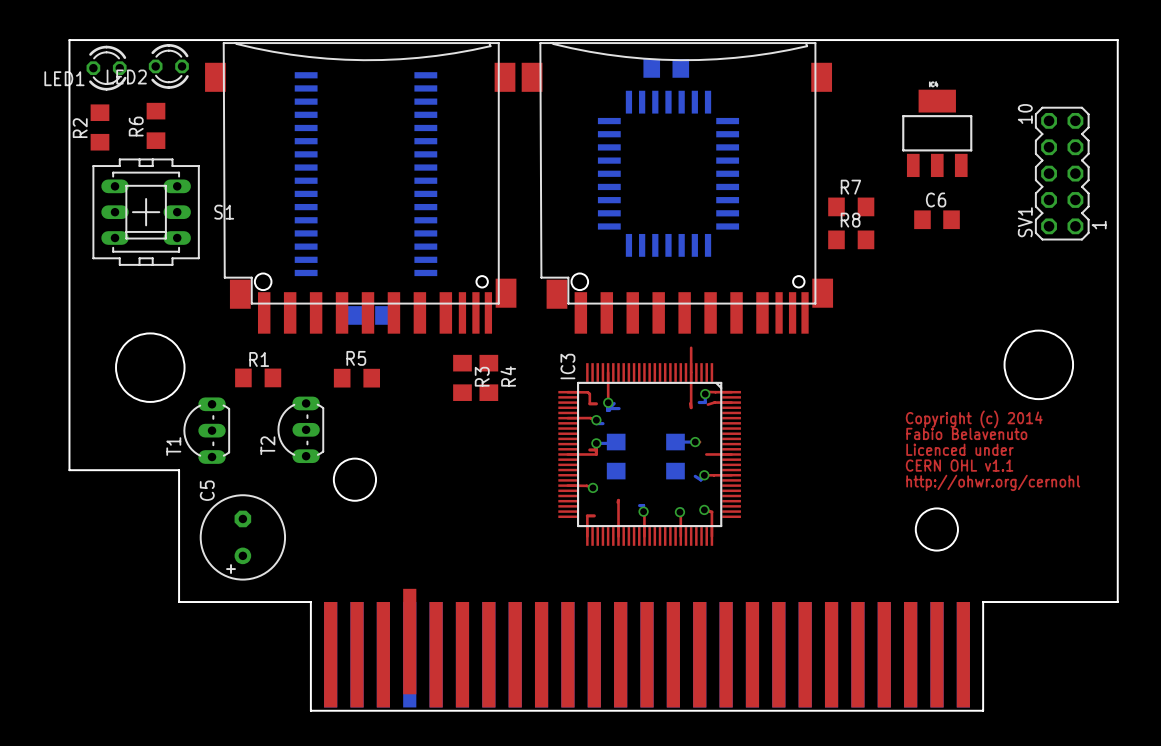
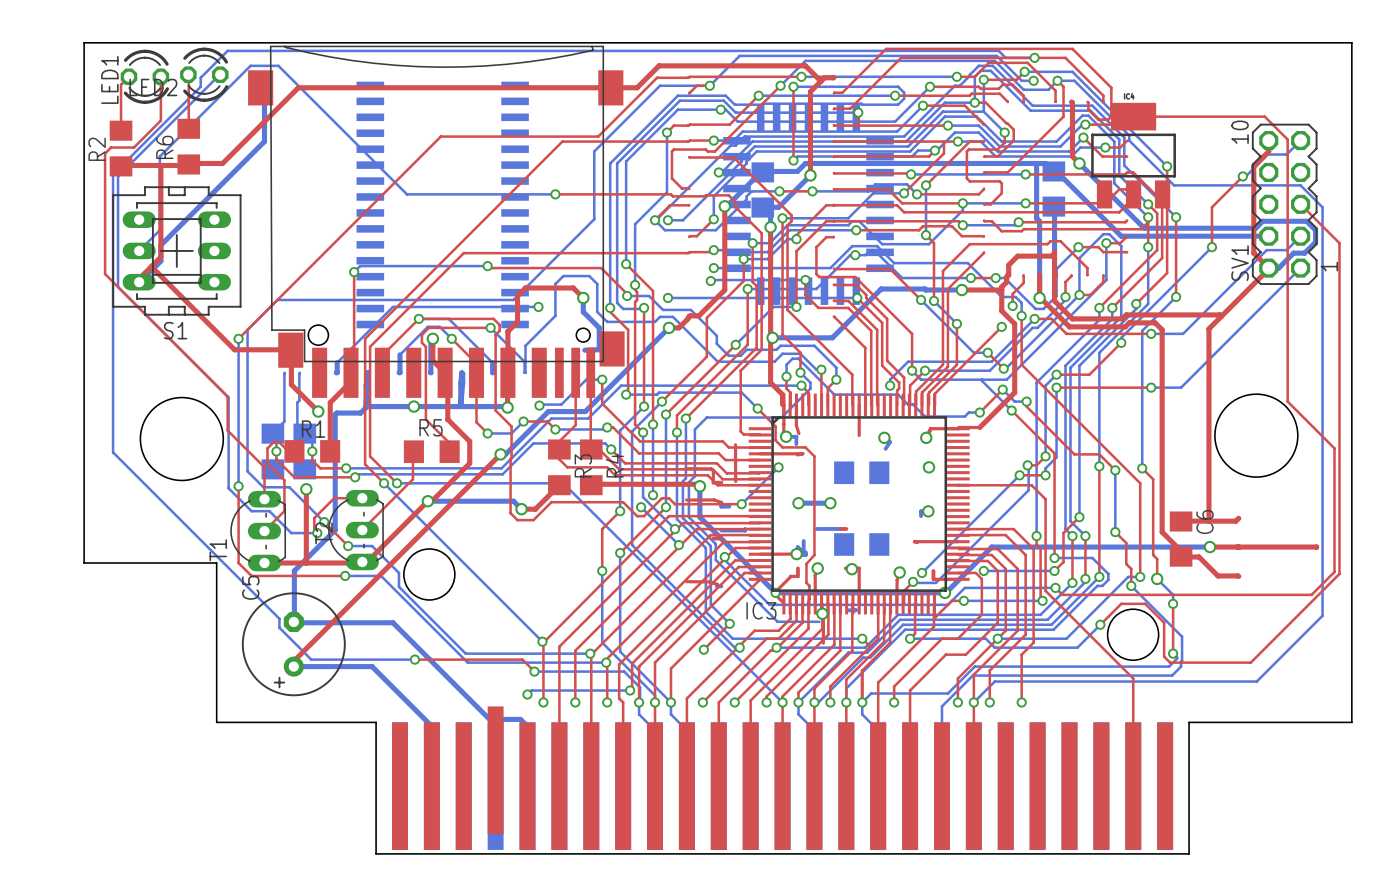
bottom track: none -> (1034, 57) (1005, 57) (998, 50) (227, 50) (200, 77) (200, 86) (113, 174) (113, 452) (279, 618) (279, 627) (311, 659) (414, 659)
via: none -> (1034, 57)
top track: none -> (1024, 71) (1016, 79) (983, 79)
bottom track: none -> (1024, 71) (1072, 71) (1167, 166)
via: none -> (1024, 71)
top track: none -> (188, 74) (188, 128)
bottom track: none -> (220, 74) (118, 176) (118, 287) (228, 397) (228, 488) (251, 511) (269, 511) (291, 533) (317, 533)
top track: none -> (129, 76) (121, 84) (121, 130)
LED1 position: (106, 68) -> (144, 76)
top track: none -> (160, 76) (160, 120) (133, 147) (111, 147) (105, 153) (105, 274) (227, 396) (227, 430) (264, 467) (264, 499)
top track: none -> (801, 76) (657, 77) (598, 136) (440, 136) (238, 338)
bottom track: none -> (801, 76) (956, 76)
via: none -> (801, 76)
part rotation: 0° (666, 68) -> 90° clockwise (762, 189)
part position: (666, 68) -> (762, 189)
top track: none -> (833, 77) (824, 77) (810, 91) (810, 175)
top track: none -> (956, 76) (974, 76) (988, 62) (1027, 62) (1055, 90) (1055, 101)
via: none -> (956, 76)
bottom track: none -> (983, 79) (983, 111)
via: none -> (983, 79)
top track: none -> (820, 81) (805, 65) (659, 65) (637, 87) (298, 87) (222, 163) (121, 166)
bottom track: none -> (1033, 80) (1021, 80) (996, 55) (739, 55) (709, 85) (660, 85) (594, 151) (594, 219) (513, 299) (277, 299) (247, 329) (247, 471) (263, 487) (289, 487) (324, 522)
via: none -> (1033, 80)
top track: none -> (1057, 80) (1063, 86) (1063, 116) (1007, 172) (984, 172)
via: none -> (1057, 80)
top track: none -> (709, 85) (696, 85) (689, 93)
via: none -> (709, 85)
top track: none -> (780, 85) (714, 151) (707, 151) (705, 149) (673, 149) (671, 151) (671, 178) (681, 188) (689, 189)
bottom track: none -> (780, 85) (805, 60) (994, 60) (1023, 89) (1048, 89) (1057, 80) (1074, 80) (1129, 135) (1129, 140) (1174, 185) (1300, 185) (1322, 207) (1322, 615) (1256, 681) (994, 681) (973, 702)
via: none -> (780, 85)
top track: none -> (793, 86) (793, 160)
bottom track: none -> (793, 86) (898, 86) (904, 92) (904, 98) (898, 104) (734, 104) (725, 95) (677, 95) (610, 163) (610, 307)
via: none -> (793, 86)
top track: none -> (930, 86) (998, 88) (1002, 84) (1012, 84) (1023, 95) (1023, 101)
bottom track: none -> (930, 86) (895, 121) (737, 121) (725, 109) (677, 109) (626, 161) (626, 264)
via: none -> (930, 86)
bottom track: none -> (264, 87) (264, 141) (160, 245) (160, 261) (139, 282)
LED1 name rotation: 0° (64, 78) -> 90° counterclockwise (109, 79)
top track: none -> (833, 93) (842, 92) (886, 48) (1072, 48) (1111, 87) (1111, 116)
top track: none -> (758, 95) (729, 124) (673, 125) (666, 132)
bottom track: none -> (758, 95) (895, 95)
via: none -> (758, 95)
top track: none -> (895, 95) (999, 93) (1007, 101)
via: none -> (895, 95)
top track: none -> (1071, 101) (1072, 156) (1079, 163)
top track: none -> (1087, 101) (1088, 109) (1098, 119) (1108, 119) (1111, 116)
top track: none -> (1103, 101) (1103, 95) (1065, 57) (901, 57) (850, 108) (833, 109)
top track: none -> (974, 102) (985, 102) (1013, 129) (1013, 140) (997, 156) (984, 156)
via: none -> (974, 102)
top track: none -> (923, 105) (964, 105) (984, 124)
bottom track: none -> (923, 105) (897, 131) (742, 131) (733, 140) (713, 140)
via: none -> (923, 105)
via: none -> (720, 109)
bottom track: none -> (983, 111) (942, 111) (908, 146) (754, 146) (682, 220) (667, 220)
bottom track: none -> (983, 111) (1004, 132)
top track: none -> (858, 112) (858, 125)
bottom track: none -> (858, 112) (735, 112) (723, 100) (679, 100) (617, 163) (617, 302) (623, 308) (644, 307)
via: none -> (858, 112)
top track: none -> (1111, 116) (1264, 116) (1287, 139) (1287, 401) (1334, 448) (1334, 571) (1311, 594) (1062, 594) (1055, 587)
top track: none -> (1085, 124) (1127, 124)
bottom track: none -> (1085, 124) (1082, 124) (1060, 146) (999, 146) (978, 125) (947, 125)
via: none -> (1085, 124)
top track: none -> (833, 125) (947, 125)
via: none -> (947, 125)
bottom track: none -> (666, 132) (666, 192) (635, 224) (635, 285)
via: none -> (666, 132)
top track: none -> (1004, 132) (1004, 142) (997, 149) (968, 149) (966, 151) (966, 178) (969, 181) (999, 181) (1001, 183) (1001, 193) (990, 204) (984, 204)
via: none -> (1004, 132)
top track: none -> (1083, 137) (1102, 156) (1127, 156)
bottom track: none -> (1083, 137) (1069, 151) (997, 151) (978, 132) (954, 132) (936, 150) (918, 150) (912, 156) (797, 156) (793, 160)
via: none -> (1083, 137)
top track: none -> (713, 140) (562, 141) (365, 338) (365, 464) (384, 483)
via: none -> (713, 140)
top track: none -> (1268, 140) (1268, 151) (1253, 166) (1253, 253) (1268, 268) (1208, 328) (1208, 521)
bottom track: none -> (1300, 140) (1286, 154) (1267, 154) (1245, 176) (1242, 176)
top track: none -> (833, 141) (957, 141)
top track: none -> (943, 141) (943, 153) (904, 193)
bottom track: none -> (957, 141) (980, 141) (995, 156) (1071, 156) (1080, 147) (1105, 147)
via: none -> (957, 141)
top track: none -> (984, 140) (969, 141) (926, 185)
top track: none -> (1127, 140) (1120, 147) (1105, 147)
via: none -> (1105, 147)
top track: none -> (934, 150) (929, 156) (833, 157)
via: none -> (934, 150)
top track: none -> (689, 157) (733, 157) (791, 215) (791, 221) (787, 225) (787, 309) (852, 374) (852, 404)
via: none -> (793, 160)
bottom track: none -> (1036, 163) (1036, 218) (1039, 221) (1039, 297)
bottom track: none -> (1079, 163) (1144, 228) (1255, 228) (1262, 221) (1306, 221) (1315, 230) (1315, 242) (1304, 253) (1293, 253) (1278, 268) (1268, 268)
via: none -> (1079, 163)
top track: none -> (160, 165) (160, 257) (139, 278) (139, 282)
top track: none -> (1167, 166) (1167, 273) (1136, 303)
via: none -> (1167, 166)
bottom track: none -> (718, 172) (721, 172) (752, 141) (906, 141) (944, 102) (974, 102) (974, 76) (980, 70) (990, 70) (1030, 110) (1090, 110) (1119, 139) (1119, 175) (1148, 204)
via: none -> (718, 172)
top track: none -> (833, 173) (911, 174)
bottom track: none -> (911, 174) (1025, 174)
via: none -> (911, 174)
top track: none -> (1025, 174) (1125, 174) (1133, 172) (1162, 201) (1162, 258) (1112, 307)
via: none -> (1025, 174)
bottom track: none -> (810, 175) (778, 207) (762, 207) (770, 209) (770, 227)
via: none -> (810, 175)
top track: none -> (1242, 176) (1211, 207) (1211, 247)
via: none -> (1242, 176)
bottom track: none -> (926, 185) (926, 235)
via: none -> (926, 185)
top track: none -> (833, 189) (888, 189) (902, 203) (962, 203)
top track: none -> (984, 188) (978, 194) (917, 194)
part: none -> (1053, 189)
top track: none -> (1127, 188) (1119, 189) (1105, 203) (1025, 203)
top track: none -> (779, 191) (812, 191)
bottom track: none -> (779, 191) (751, 191) (746, 196) (746, 199) (715, 230) (665, 230) (655, 220) (730, 145) (735, 145) (744, 136) (904, 136) (954, 85) (959, 85) (978, 65) (992, 65) (1032, 105) (1092, 105) (1124, 137) (1124, 165) (1176, 217)
via: none -> (779, 191)
bottom track: none -> (812, 191) (868, 191) (875, 184) (907, 184) (917, 194)
via: none -> (812, 191)
bottom track: none -> (904, 193) (873, 193) (848, 218) (782, 218)
via: none -> (904, 193)
top track: none -> (555, 194) (728, 195) (735, 202) (735, 207) (761, 233) (761, 349) (740, 370) (740, 431) (743, 434) (759, 434)
bottom track: none -> (555, 194) (406, 194) (278, 65) (250, 65) (159, 156) (159, 230) (139, 250)
via: none -> (555, 194)
via: none -> (917, 194)
via: none -> (962, 203)
bottom track: none -> (1025, 203) (962, 203) (962, 210) (929, 244) (882, 244) (859, 221) (852, 221) (848, 225) (787, 225) (769, 243) (752, 243)
via: none -> (1025, 203)
top track: none -> (1127, 204) (1119, 212) (904, 212) (897, 205) (826, 205) (796, 235) (796, 239)
top track: none -> (1148, 204) (1157, 213) (1157, 250) (1099, 307)
via: none -> (1148, 204)
top track: none -> (1300, 204) (1339, 243) (1339, 573) (1250, 662) (1170, 662) (1164, 656) (1164, 622) (1145, 603) (1121, 603) (1100, 624)
top track: none -> (689, 204) (669, 205) (655, 220)
top track: none -> (724, 206) (724, 290) (698, 315) (689, 315) (678, 327) (668, 327)
bottom track: none -> (724, 206) (760, 172) (797, 171) (805, 163) (1045, 163) (1053, 171) (1055, 170) (1121, 236) (1268, 236)
via: none -> (724, 206)
bottom track: none -> (1053, 206) (1054, 252)
top track: none -> (1148, 217) (1148, 247)
bottom track: none -> (1148, 217) (1114, 183) (1114, 141) (1088, 115) (1082, 115) (1056, 141) (1001, 141) (976, 116) (944, 116) (910, 151) (756, 151) (713, 196) (713, 219)
via: none -> (1148, 217)
top track: none -> (1176, 217) (1176, 296)
via: none -> (1176, 217)
top track: none -> (713, 219) (696, 236) (689, 236)
via: none -> (713, 219)
top track: none -> (782, 218) (782, 334) (800, 352) (800, 372)
via: none -> (782, 218)
via: none -> (655, 220)
via: none -> (667, 220)
top track: none -> (984, 220) (991, 221) (1001, 231) (1021, 231) (1023, 229) (1141, 229) (1148, 222)
top track: none -> (1127, 220) (1125, 222) (1018, 222)
part: (677, 188) -> none
bottom track: none -> (1018, 222) (1015, 225) (962, 225)
via: none -> (1018, 222)
top track: none -> (962, 225) (958, 221) (826, 221) (796, 251) (796, 306)
via: none -> (962, 225)
top track: none -> (770, 227) (770, 382) (782, 394) (783, 433) (786, 436)
via: none -> (770, 227)
top track: none -> (856, 230) (919, 230) (923, 226) (951, 226) (961, 236) (984, 236)
bottom track: none -> (856, 230) (789, 230) (767, 252) (713, 250)
via: none -> (856, 230)
top track: none -> (926, 235) (933, 243) (933, 300)
via: none -> (926, 235)
bottom track: none -> (1300, 236) (1286, 250) (1266, 250) (1183, 333) (1151, 333)
top track: none -> (833, 236) (826, 237) (816, 247) (816, 274) (819, 277) (855, 277) (912, 333) (912, 370)
top track: none -> (1127, 236) (1120, 243) (1106, 243)
bottom track: none -> (796, 239) (787, 239) (767, 259) (743, 259)
via: none -> (796, 239)
top track: none -> (752, 243) (752, 282) (756, 286) (756, 347) (685, 418)
via: none -> (752, 243)
bottom track: none -> (1106, 243) (1106, 280) (1006, 379) (921, 379) (912, 370)
via: none -> (1106, 243)
R7: (851, 206) -> none
top track: none -> (1078, 247) (1098, 247) (1103, 252) (1127, 252)
bottom track: none -> (1078, 247) (1056, 269) (1056, 295) (1043, 308) (1035, 308) (1004, 278) (995, 278)
via: none -> (1078, 247)
bottom track: none -> (1148, 247) (1148, 303) (1099, 352) (1099, 466)
via: none -> (1148, 247)
bottom track: none -> (1211, 247) (1121, 337) (1121, 342)
via: none -> (1211, 247)
top track: none -> (713, 250) (711, 252) (687, 253) (463, 253) (370, 346) (370, 456) (397, 483)
via: none -> (713, 250)
S1 name position: S1 (224, 212) -> S1 (175, 330)
top track: none -> (984, 252) (947, 289) (947, 366) (922, 392) (921, 404)
via: none -> (855, 255)
top track: none -> (743, 259) (743, 281) (706, 317) (706, 356) (662, 401)
via: none -> (743, 259)
C6 rotation: 0° (937, 219) -> 90° clockwise (1181, 539)
C6 position: (937, 219) -> (1181, 539)
top track: none -> (626, 264) (653, 291) (653, 424)
via: none -> (626, 264)
top track: none -> (487, 266) (489, 268) (601, 268) (627, 295)
bottom track: none -> (487, 266) (360, 266) (354, 272)
via: none -> (487, 266)
top track: none -> (151, 266) (234, 349) (290, 349) (291, 384) (318, 411)
bottom track: none -> (713, 268) (830, 268) (852, 246) (877, 246) (894, 263) (967, 263) (1001, 296) (1015, 296) (1021, 302) (1021, 315)
via: none -> (713, 268)
top track: none -> (833, 268) (890, 269) (921, 299)
bottom track: none -> (1300, 268) (1181, 387) (1151, 387)
top track: none -> (354, 272) (354, 375) (350, 379)
via: none -> (354, 272)
top track: none -> (1023, 275) (1023, 283) (1012, 293) (1012, 305)
top track: none -> (1039, 275) (1039, 297) (1069, 326) (1125, 326) (1129, 322) (1155, 322) (1162, 329) (1162, 532) (1180, 550) (1181, 557) (1199, 557) (1217, 575) (1238, 576)
top track: none -> (1055, 275) (1054, 252) (1052, 256) (1017, 256) (1008, 265) (1006, 282) (1001, 287) (1001, 310) (1014, 323) (1014, 392) (979, 427) (930, 428) (926, 437)
top track: none -> (1055, 275) (1054, 300) (1072, 318) (1122, 318) (1126, 314) (1221, 316)
top track: none -> (1071, 275) (1065, 282) (1065, 296)
top track: none -> (1087, 275) (1087, 268) (1060, 241) (1050, 241) (1047, 244) (969, 244) (942, 271) (942, 364) (916, 391) (915, 404)
top track: none -> (1103, 275) (1103, 282) (1090, 294) (1079, 294)
top track: none -> (970, 278) (995, 278)
bottom track: none -> (970, 278) (902, 278) (875, 251) (869, 251) (865, 255) (850, 255) (816, 289) (747, 289)
via: none -> (970, 278)
via: none -> (995, 278)
top track: none -> (805, 280) (805, 294) (818, 307) (848, 307) (871, 330) (871, 404)
bottom track: none -> (805, 280) (710, 281)
via: none -> (805, 280)
via: none -> (710, 281)
R8: (851, 239) -> none
top track: none -> (635, 285) (637, 292) (637, 299) (635, 301) (635, 424) (643, 432)
via: none -> (635, 285)
top track: none -> (833, 284) (856, 285) (887, 318) (887, 360) (904, 377) (903, 404)
top track: none -> (747, 289) (747, 344) (676, 415) (676, 432)
via: none -> (747, 289)
top track: none -> (961, 290) (1001, 290)
bottom track: none -> (961, 290) (881, 289) (832, 337) (772, 337)
via: none -> (961, 290)
via: none -> (1079, 294)
bottom track: none -> (627, 295) (649, 295) (663, 309) (690, 309) (716, 335) (716, 343) (728, 355) (740, 355) (746, 349) (776, 349) (780, 345) (814, 345) (836, 367) (836, 379)
via: none -> (627, 295)
bottom track: none -> (1065, 296) (1065, 299) (1037, 327) (1032, 327) (989, 370) (925, 370)
via: none -> (1065, 296)
bottom track: none -> (1176, 296) (1142, 330) (1142, 468)
via: none -> (1176, 296)
top track: none -> (583, 297) (573, 288) (525, 288) (517, 295) (517, 321) (507, 331) (507, 407)
bottom track: none -> (583, 297) (583, 311) (599, 327) (599, 349) (584, 350)
via: none -> (583, 297)
bottom track: none -> (667, 297) (857, 297)
via: none -> (667, 297)
top track: none -> (857, 297) (882, 322) (882, 365) (899, 382) (896, 404)
via: none -> (857, 297)
via: none -> (1039, 297)
bottom track: none -> (921, 299) (973, 352) (987, 352)
via: none -> (921, 299)
top track: none -> (833, 300) (848, 300) (877, 329) (878, 404)
bottom track: none -> (933, 300) (956, 323)
via: none -> (933, 300)
bottom track: none -> (1136, 303) (1136, 308) (1079, 365) (1079, 517)
via: none -> (1136, 303)
via: none -> (1012, 305)
bottom track: none -> (538, 306) (393, 306) (337, 362) (336, 372)
via: none -> (538, 306)
bottom track: none -> (796, 306) (773, 306) (735, 344)
via: none -> (796, 306)
top track: none -> (610, 307) (610, 311) (628, 329) (628, 392) (626, 394)
via: none -> (610, 307)
top track: none -> (644, 307) (644, 406)
via: none -> (644, 307)
bottom track: none -> (1099, 307) (1099, 319) (1036, 382) (1036, 536)
via: none -> (1099, 307)
bottom track: none -> (1112, 307) (1112, 318) (1065, 365) (1065, 529) (1072, 536)
via: none -> (1112, 307)
top track: none -> (1021, 315) (1021, 364) (1140, 483) (1140, 576)
via: none -> (1021, 315)
top track: none -> (833, 316) (865, 347) (865, 404)
bottom track: none -> (418, 318) (448, 318) (492, 362) (493, 372)
via: none -> (418, 318)
top track: none -> (1034, 318) (1051, 318) (1066, 333) (1151, 333)
bottom track: none -> (1034, 318) (991, 361) (908, 361) (890, 379) (890, 385)
via: none -> (1034, 318)
top track: none -> (956, 323) (956, 364) (929, 392) (928, 404)
via: none -> (956, 323)
top track: none -> (1001, 326) (934, 393) (934, 404)
via: none -> (1001, 326)
top track: none -> (490, 327) (428, 327) (421, 334) (421, 342) (425, 346) (425, 419) (448, 442) (448, 451) (441, 451)
bottom track: none -> (490, 327) (524, 361) (525, 372) (525, 345) (555, 315) (555, 284) (563, 276) (589, 276) (597, 284) (597, 311) (607, 321) (655, 321) (660, 316) (672, 316) (717, 361) (774, 361) (782, 353) (800, 353) (816, 369) (821, 369)
via: none -> (490, 327)
bottom track: none -> (668, 327) (585, 411) (548, 411) (505, 454) (500, 454)
via: none -> (668, 327)
via: none -> (1151, 333)
bottom track: none -> (238, 338) (238, 486)
via: none -> (238, 338)
top track: none -> (432, 338) (432, 360) (445, 372)
bottom track: none -> (432, 338) (430, 340) (430, 372)
via: none -> (432, 338)
top track: none -> (451, 338) (475, 362) (476, 422) (487, 433)
bottom track: none -> (451, 338) (439, 326) (427, 326) (399, 354) (399, 372)
via: none -> (451, 338)
via: none -> (772, 337)
top track: none -> (1121, 342) (1089, 374) (1056, 374)
via: none -> (1121, 342)
top track: none -> (735, 344) (665, 414)
via: none -> (735, 344)
top track: none -> (987, 352) (1003, 368)
via: none -> (987, 352)
bottom track: none -> (1003, 368) (1079, 294) (1079, 258) (1103, 234) (1109, 234) (1121, 246) (1121, 316) (1070, 367) (1070, 521) (1085, 536)
via: none -> (1003, 368)
top track: none -> (821, 369) (821, 404)
via: none -> (821, 369)
via: none -> (912, 370)
top track: none -> (925, 370) (910, 385) (909, 404)
via: none -> (925, 370)
bottom track: none -> (284, 372) (284, 421) (272, 433) (276, 437) (276, 451)
bottom track: none -> (299, 372) (297, 425) (312, 441) (312, 451)
top track: none -> (351, 372) (350, 382) (330, 402) (330, 451)
top track: none -> (382, 372) (383, 354) (418, 318) (493, 318) (499, 324) (499, 330) (495, 334) (495, 410) (511, 426) (510, 513) (517, 520) (533, 520) (551, 502) (623, 502) (637, 516) (644, 516) (662, 498) (668, 498) (674, 504) (741, 504)
top track: none -> (445, 372) (447, 375) (447, 419) (469, 441) (469, 463) (431, 501) (427, 501) (370, 561) (362, 561)
bottom track: none -> (461, 372) (462, 382) (460, 406) (460, 383) (461, 372)
top track: none -> (575, 372) (575, 425) (559, 441) (559, 459) (567, 467) (607, 467) (615, 475) (707, 475) (717, 485) (759, 485)
top track: none -> (590, 372) (590, 448) (597, 447) (619, 469) (712, 469) (722, 479) (760, 478)
bottom track: none -> (800, 372) (810, 382) (810, 388) (781, 417) (706, 417) (694, 429) (694, 476) (688, 482) (688, 517) (715, 544) (715, 560) (777, 621) (819, 621)
via: none -> (800, 372)
bottom track: none -> (1056, 374) (1045, 385) (1045, 456)
via: none -> (1056, 374)
part: (368, 315) -> none
top track: none -> (786, 376) (786, 388) (790, 392) (790, 404)
bottom track: none -> (786, 376) (786, 364) (792, 358) (798, 358) (834, 394) (898, 394) (908, 404) (913, 404) (925, 416) (964, 416) (968, 412) (979, 412)
via: none -> (786, 376)
top track: none -> (602, 379) (602, 403) (640, 441) (722, 441) (728, 447) (760, 447)
bottom track: none -> (602, 379) (586, 379) (561, 404) (539, 405)
via: none -> (602, 379)
top track: none -> (836, 379) (827, 388) (827, 404)
via: none -> (836, 379)
bottom track: none -> (981, 379) (1011, 410)
top track: none -> (801, 385) (808, 392) (808, 404)
bottom track: none -> (801, 385) (621, 385) (588, 418) (551, 418) (501, 468) (346, 468)
via: none -> (801, 385)
via: none -> (890, 385)
top track: none -> (1056, 387) (1151, 387)
bottom track: none -> (1056, 387) (1056, 457) (1045, 468) (1045, 475)
via: none -> (1056, 387)
via: none -> (1151, 387)
top track: none -> (1002, 389) (979, 412)
bottom track: none -> (1002, 389) (1014, 401) (1026, 401)
via: none -> (1002, 389)
bottom track: none -> (626, 394) (741, 392) (757, 408)
via: none -> (626, 394)
bottom track: none -> (662, 401) (632, 431) (632, 545) (734, 647) (739, 647)
via: none -> (662, 401)
top track: none -> (1026, 401) (1026, 406) (1074, 454) (1099, 454) (1115, 470)
via: none -> (1026, 401)
top track: none -> (796, 404) (796, 425) (798, 433)
top track: none -> (859, 404) (859, 435)
via: none -> (413, 406)
via: none -> (539, 405)
bottom track: none -> (644, 406) (620, 430) (620, 511)
via: none -> (644, 406)
bottom track: none -> (507, 407) (506, 406) (366, 406) (366, 385) (367, 372) (367, 373) (367, 382) (366, 407) (360, 413) (335, 414) (335, 530) (294, 570) (293, 621) (393, 622) (494, 724) (495, 786) (495, 726) (502, 719) (520, 719) (527, 726) (527, 786)
via: none -> (507, 407)
top track: none -> (757, 408) (775, 426) (775, 440) (782, 447) (805, 447) (814, 456) (814, 555) (806, 563) (806, 582) (809, 585) (808, 628) (734, 702)
via: none -> (757, 408)
via: none -> (318, 411)
top track: none -> (1011, 410) (1054, 453) (1054, 558)
via: none -> (1011, 410)
via: none -> (979, 412)
bottom track: none -> (665, 414) (665, 507)
via: none -> (665, 414)
top track: (691, 347) (691, 407) (690, 403) -> none
bottom track: none -> (685, 418) (685, 478) (682, 481) (682, 518) (710, 546) (710, 604) (729, 623)
via: none -> (685, 418)
top track: none -> (523, 421) (547, 421) (555, 429)
bottom track: none -> (523, 421) (511, 433) (487, 433)
via: none -> (523, 421)
bottom track: none -> (653, 424) (653, 495)
via: none -> (653, 424)
top track: none -> (607, 427) (613, 427) (639, 453) (718, 453) (725, 460) (760, 460)
bottom track: none -> (607, 427) (605, 429) (555, 429)
via: none -> (607, 427)
via: none -> (555, 429)
bottom track: none -> (643, 432) (643, 497) (674, 529)
via: none -> (643, 432)
bottom track: none -> (676, 432) (676, 519) (705, 548) (705, 611) (732, 638) (862, 638)
via: none -> (676, 432)
via: none -> (487, 433)
bottom track: none -> (786, 436) (796, 436) (796, 444)
via: none -> (786, 436)
bottom track: none -> (884, 437) (890, 442) (885, 448)
via: none -> (884, 437)
via: none -> (926, 437)
top track: none -> (611, 449) (625, 463) (716, 463) (726, 473) (760, 472)
bottom track: none -> (611, 449) (605, 443) (533, 443) (502, 474) (358, 474) (355, 477)
via: none -> (611, 449)
top track: none -> (276, 451) (276, 459) (294, 477) (355, 477)
via: none -> (276, 451)
top track: none -> (294, 451) (288, 451) (279, 442) (273, 442) (267, 448) (267, 463) (284, 480) (284, 511) (264, 531)
top track: none -> (312, 451) (312, 460) (320, 468) (346, 468)
via: none -> (312, 451)
R3 position: (462, 377) -> (559, 467)
R4 position: (488, 377) -> (591, 467)
part: none -> (272, 451)
part: none -> (304, 451)
top track: none -> (405, 451) (412, 452) (412, 479) (362, 530)
top track: none -> (760, 453) (802, 453) (797, 454)
top track: none -> (500, 454) (294, 660) (293, 666)
via: none -> (500, 454)
top track: none -> (1045, 456) (1036, 465) (1027, 465)
via: none -> (1045, 456)
bottom track: none -> (1027, 465) (1028, 490) (935, 582) (913, 581)
via: none -> (1027, 465)
top track: none -> (1099, 466) (1099, 576)
via: none -> (1099, 466)
via: none -> (346, 468)
bottom track: none -> (778, 467) (741, 504)
via: none -> (778, 467)
via: none -> (928, 467)
top track: none -> (1142, 468) (1153, 479) (1153, 555) (1157, 559) (1157, 578)
via: none -> (1142, 468)
top track: (731, 392) (707, 392) (705, 394) -> none
bottom track: none -> (1115, 470) (1115, 532)
via: none -> (1115, 470)
bottom track: (705, 394) (705, 402) (699, 402) -> none
via: (705, 394) -> none
part: none -> (861, 472)
top track: none -> (1019, 475) (1045, 475)
bottom track: none -> (1019, 475) (922, 572)
via: none -> (1019, 475)
via: none -> (1045, 475)
via: none -> (355, 477)
bottom track: (608, 402) (607, 408) (619, 408) -> none
via: (608, 402) -> none
top track: (731, 402) (714, 402) (707, 404) -> none
bottom track: (614, 403) (607, 410) (609, 410) -> none
bottom track: none -> (384, 483) (542, 641)
via: none -> (384, 483)
bottom track: none -> (397, 483) (563, 483) (782, 702)
via: none -> (397, 483)
top track: none -> (557, 484) (559, 485) (535, 509) (521, 509)
top track: none -> (591, 485) (698, 484) (699, 486)
top track: none -> (958, 485) (1031, 485) (1045, 499) (1045, 590) (1133, 678) (1133, 786)
top track: none -> (238, 486) (238, 562) (251, 575) (345, 575)
via: none -> (238, 486)
bottom track: none -> (699, 486) (699, 517) (775, 592) (944, 592) (991, 547) (1209, 547)
via: none -> (699, 486)
top track: none -> (306, 489) (306, 562)
via: none -> (306, 489)
via: none -> (653, 495)
top track: none -> (362, 498) (334, 498) (314, 518) (314, 530) (317, 533)
bottom track: none -> (427, 501) (513, 501) (521, 509)
via: none -> (427, 501)
text: Copyright (c) 2014 (974, 419) -> none
via: (596, 420) -> none
bottom track: none -> (798, 503) (830, 503)
via: none -> (798, 503)
via: none -> (830, 503)
via: none -> (741, 504)
bottom track: none -> (641, 507) (678, 545)
via: none -> (641, 507)
top track: none -> (665, 507) (620, 553)
via: none -> (665, 507)
via: none -> (521, 509)
top track: none -> (620, 511) (602, 529) (602, 570)
via: none -> (620, 511)
bottom track: none -> (928, 511) (921, 511) (921, 516)
via: none -> (928, 511)
T2 position: (300, 429) -> (355, 530)
T1 position: (206, 430) -> (258, 531)
top track: none -> (760, 516) (668, 516) (543, 642)
top track: none -> (1079, 517) (1063, 533) (1063, 561) (1054, 570)
via: none -> (1079, 517)
text: Fabio Belavenuto (966, 433) -> none
top track: none -> (1238, 518) (1235, 521) (1181, 521)
top track: none -> (324, 522) (348, 546)
via: none -> (324, 522)
top track: none -> (760, 522) (682, 523) (559, 646) (559, 786)
via: none -> (674, 529)
top track: none -> (760, 529) (696, 529) (575, 650) (575, 702)
via: (695, 442) -> none
top track: none -> (958, 529) (1013, 529) (1033, 549) (1033, 642) (1021, 654) (1021, 702)
top track: (596, 443) (596, 454) (567, 454) -> none
via: (596, 443) -> none
top track: none -> (1115, 532) (1126, 543) (1126, 563) (1131, 568) (1131, 585)
via: none -> (1115, 532)
via: none -> (317, 533)
top track: none -> (760, 535) (710, 535) (591, 654)
top track: none -> (958, 535) (1005, 535) (1025, 555) (1025, 634) (989, 670) (989, 702)
top track: none -> (1036, 536) (1036, 545) (1040, 549) (1040, 598) (1042, 600)
via: none -> (1036, 536)
top track: none -> (1072, 536) (1072, 582)
via: none -> (1072, 536)
top track: none -> (1085, 536) (1085, 578)
via: none -> (1085, 536)
text: Licenced under (960, 449) -> none
top track: none -> (760, 541) (723, 542) (607, 658) (607, 702)
bottom track: none -> (803, 540) (803, 554) (796, 554)
top track: none -> (958, 541) (914, 541) (917, 542)
IC3 rotation: 0° (649, 454) -> 90° counterclockwise (859, 504)
top track: (706, 454) (731, 454) -> none
part: none -> (861, 544)
via: none -> (678, 545)
bottom track: none -> (348, 546) (372, 546) (398, 572) (398, 586) (465, 653) (590, 653)
via: none -> (348, 546)
part: (616, 456) -> none
bottom track: none -> (797, 546) (805, 554) (805, 552)
part: (675, 456) -> none
top track: none -> (759, 548) (735, 548) (619, 664) (619, 698) (623, 702) (623, 786)
top track: none -> (958, 547) (997, 549) (1017, 568) (1017, 630) (973, 674) (973, 786)
top track: none -> (1209, 547) (1316, 547)
via: none -> (1209, 547)
bottom track: none -> (620, 553) (620, 651) (670, 702) (670, 714) (686, 730) (686, 786)
via: none -> (620, 553)
top track: none -> (796, 554) (760, 554)
via: none -> (796, 554)
top track: none -> (958, 554) (991, 555) (1005, 568) (1005, 630) (957, 678) (957, 702)
bottom track: none -> (724, 557) (724, 560) (769, 604) (947, 604) (964, 587) (1055, 587)
via: none -> (724, 557)
text: CERN OHL v1.1 (959, 465) -> none
bottom track: none -> (1054, 558) (1092, 558) (1108, 573) (1108, 579) (1102, 585) (1097, 585) (1053, 629) (905, 629) (846, 688) (846, 702)
via: none -> (1054, 558)
top track: none -> (760, 560) (735, 560) (632, 663) (632, 689) (630, 690)
top track: none -> (958, 560) (987, 561) (997, 570) (997, 622) (965, 654) (945, 654) (910, 690) (910, 786)
top track: none -> (362, 561) (264, 562)
top track: none -> (760, 566) (738, 566) (639, 666) (639, 702)
top track: none -> (797, 568) (797, 576) (790, 576) (775, 591) (775, 594) (783, 603)
top track: none -> (817, 568) (815, 575) (815, 603)
via: none -> (817, 568)
top track: none -> (845, 568) (859, 568) (859, 603)
top track: (704, 475) (731, 475) -> none
bottom track: (704, 475) (700, 479) (695, 476) -> none
bottom track: none -> (602, 570) (602, 642) (655, 695) (655, 702)
via: none -> (602, 570)
top track: none -> (933, 570) (933, 579) (958, 579)
bottom track: none -> (983, 570) (1054, 570)
via: none -> (983, 570)
via: none -> (1054, 570)
top track: none -> (759, 572) (744, 572) (655, 662) (655, 786)
top track: none -> (899, 572) (897, 579) (896, 603)
via: none -> (899, 572)
via: none -> (922, 572)
top track: none -> (958, 572) (975, 572) (981, 578) (981, 614) (957, 638) (941, 638) (894, 686) (894, 702)
bottom track: none -> (345, 575) (381, 575) (467, 662) (606, 662)
via: none -> (345, 575)
bottom track: none -> (1099, 576) (1051, 624) (903, 624) (870, 657) (863, 657) (818, 702) (814, 702)
via: none -> (1099, 576)
bottom track: none -> (1140, 576) (1128, 576) (1066, 638) (997, 638)
via: none -> (1140, 576)
text: http://ohwr.org/cernohl (993, 482) -> none
top track: none -> (760, 579) (670, 668) (670, 702)
bottom track: none -> (1085, 578) (1085, 581) (1047, 619) (900, 619) (867, 652) (848, 652) (798, 702) (798, 714) (814, 730) (814, 786)
via: none -> (1085, 578)
bottom track: none -> (1157, 578) (1173, 594) (1173, 603)
via: none -> (1157, 578)
top track: none -> (913, 581) (904, 590) (903, 603)
via: none -> (913, 581)
bottom track: none -> (1072, 582) (1040, 614) (898, 614) (865, 647) (776, 647)
via: none -> (1072, 582)
via: (592, 487) -> none
bottom track: none -> (1131, 585) (1182, 636) (1181, 666) (1172, 675) (972, 675) (941, 706) (941, 786)
via: none -> (1131, 585)
via: none -> (1055, 587)
via: none -> (775, 592)
via: none -> (944, 592)
top track: none -> (963, 600) (951, 600) (933, 617)
bottom track: none -> (963, 600) (1042, 600)
via: none -> (963, 600)
via: none -> (1042, 600)
top track: (618, 502) (618, 500) (618, 536) -> none
top track: none -> (790, 603) (790, 618) (778, 630) (754, 630) (686, 698) (686, 786)
top track: none -> (796, 603) (796, 620) (778, 638) (766, 638) (702, 702)
top track: none -> (802, 603) (802, 622) (774, 650) (770, 650) (718, 702) (718, 786)
top track: none -> (821, 603) (822, 628) (750, 700) (750, 786)
top track: none -> (827, 603) (828, 634) (766, 696) (766, 702)
top track: none -> (834, 603) (834, 644) (782, 696) (782, 786)
top track: none -> (840, 603) (840, 650) (798, 692) (798, 702)
top track: none -> (852, 603) (852, 650) (814, 688) (814, 786)
top track: none -> (878, 603) (878, 638) (830, 686) (830, 702)
top track: none -> (884, 603) (884, 641) (846, 679) (846, 786)
top track: none -> (890, 603) (890, 642) (862, 670) (862, 702)
top track: none -> (915, 603) (915, 633) (910, 638)
top track: none -> (934, 603) (933, 626) (878, 682) (878, 786)
top track: none -> (1173, 603) (1173, 653)
via: none -> (1173, 603)
bottom track: (639, 505) (643, 505) (643, 511) -> none
top track: (704, 509) (711, 512) (711, 536) -> none
via: (704, 509) -> none
top track: (643, 511) (644, 536) -> none
via: (643, 511) -> none
top track: (594, 515) (587, 515) (587, 536) -> none
top track: none -> (729, 623) (703, 649)
via: none -> (729, 623)
bottom track: none -> (1100, 624) (1077, 647) (994, 647) (985, 638) (910, 638)
via: none -> (1100, 624)
top track: none -> (862, 638) (870, 646)
via: none -> (862, 638)
via: none -> (910, 638)
via: none -> (997, 638)
via: none -> (542, 641)
top track: none -> (543, 642) (543, 702)
via: none -> (739, 647)
via: none -> (776, 647)
via: none -> (703, 649)
top track: none -> (591, 654) (591, 786)
via: none -> (590, 653)
bottom track: none -> (1173, 653) (1177, 658) (1169, 666) (974, 666) (947, 693) (871, 693) (862, 702) (862, 714) (878, 730) (878, 786)
via: none -> (1173, 653)
top track: none -> (414, 659) (522, 659) (534, 671)
via: none -> (414, 659)
via: none -> (606, 662)
bottom track: none -> (293, 666) (372, 666) (431, 726) (431, 786)
bottom track: none -> (534, 671) (624, 671) (640, 687) (639, 714) (655, 730) (655, 786)
via: none -> (534, 671)
bottom track: none -> (630, 690) (531, 690) (527, 694)
via: none -> (630, 690)
via: none -> (527, 694)
via: none -> (543, 702)
via: none -> (575, 702)
via: none -> (607, 702)
via: none -> (639, 702)
via: none -> (655, 702)
via: none -> (670, 702)
via: none -> (702, 702)
via: none -> (734, 702)
via: none -> (766, 702)
via: none -> (782, 702)
via: none -> (798, 702)
via: none -> (814, 702)
via: none -> (830, 702)
via: none -> (846, 702)
via: none -> (862, 702)
via: none -> (894, 702)
via: none -> (957, 702)
via: none -> (973, 702)
via: none -> (989, 702)
via: none -> (1021, 702)

